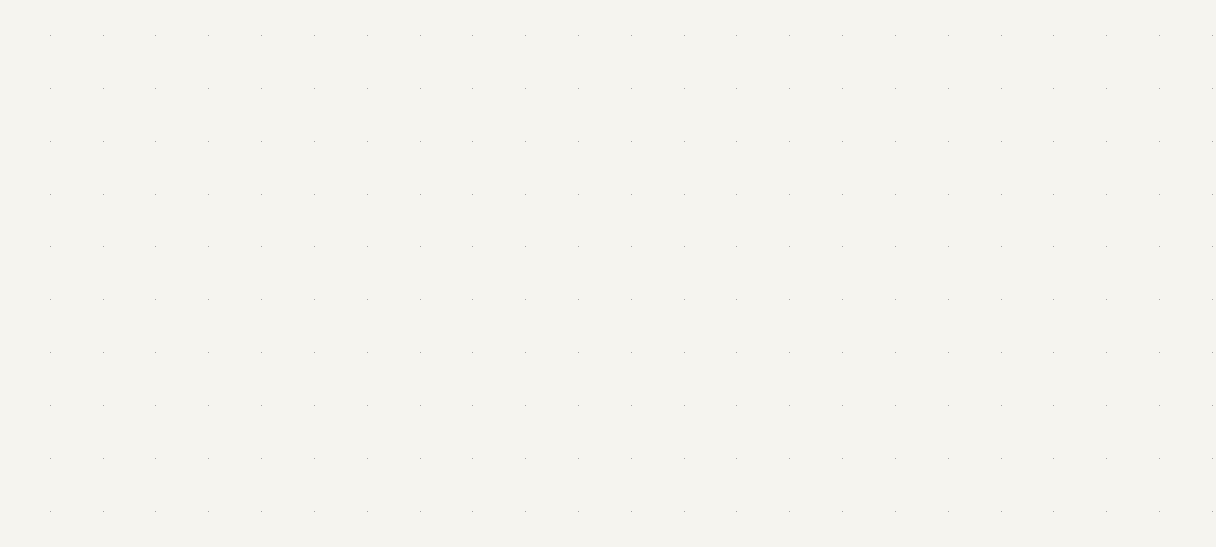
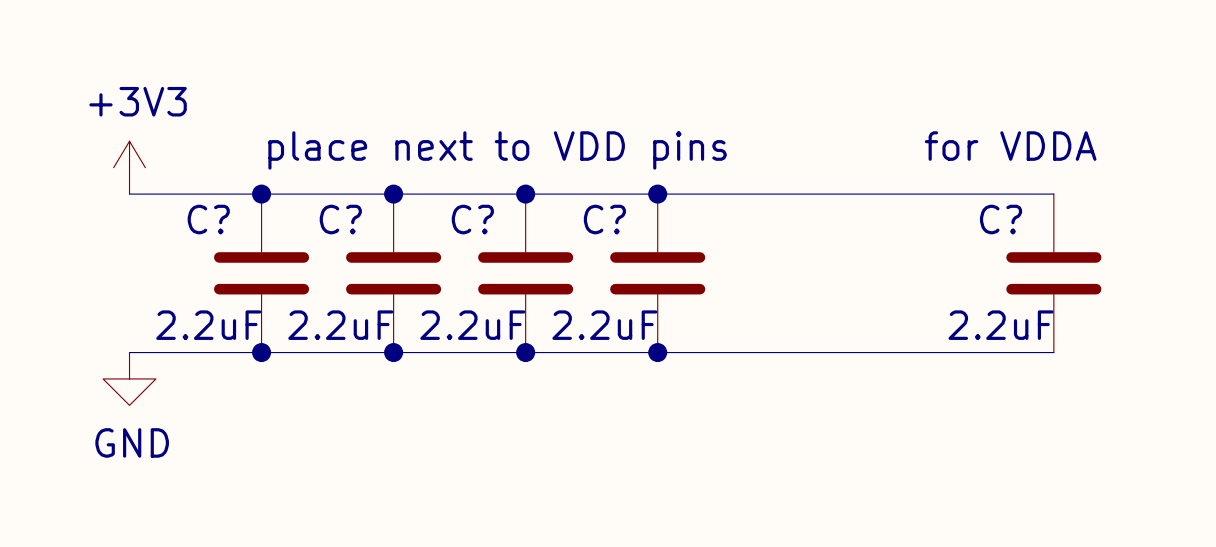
text: none -> for VDDA (1010, 146)
text: none -> place next to VDD pins (497, 150)
power symbol: none -> +3V3 (129, 167)
wire: none -> (129, 194) (1053, 194)
junction: none -> (261, 194)
junction: none -> (393, 194)
junction: none -> (525, 194)
junction: none -> (657, 194)
C?: none -> 2.2uF (261, 273)
C?: none -> 2.2uF (393, 273)
C?: none -> 2.2uF (525, 273)
C?: none -> 2.2uF (657, 273)
C?: none -> 2.2uF (1053, 273)
wire: none -> (129, 352) (1053, 352)
junction: none -> (261, 352)
junction: none -> (393, 352)
junction: none -> (525, 352)
junction: none -> (657, 352)
power symbol: none -> GND (129, 378)

